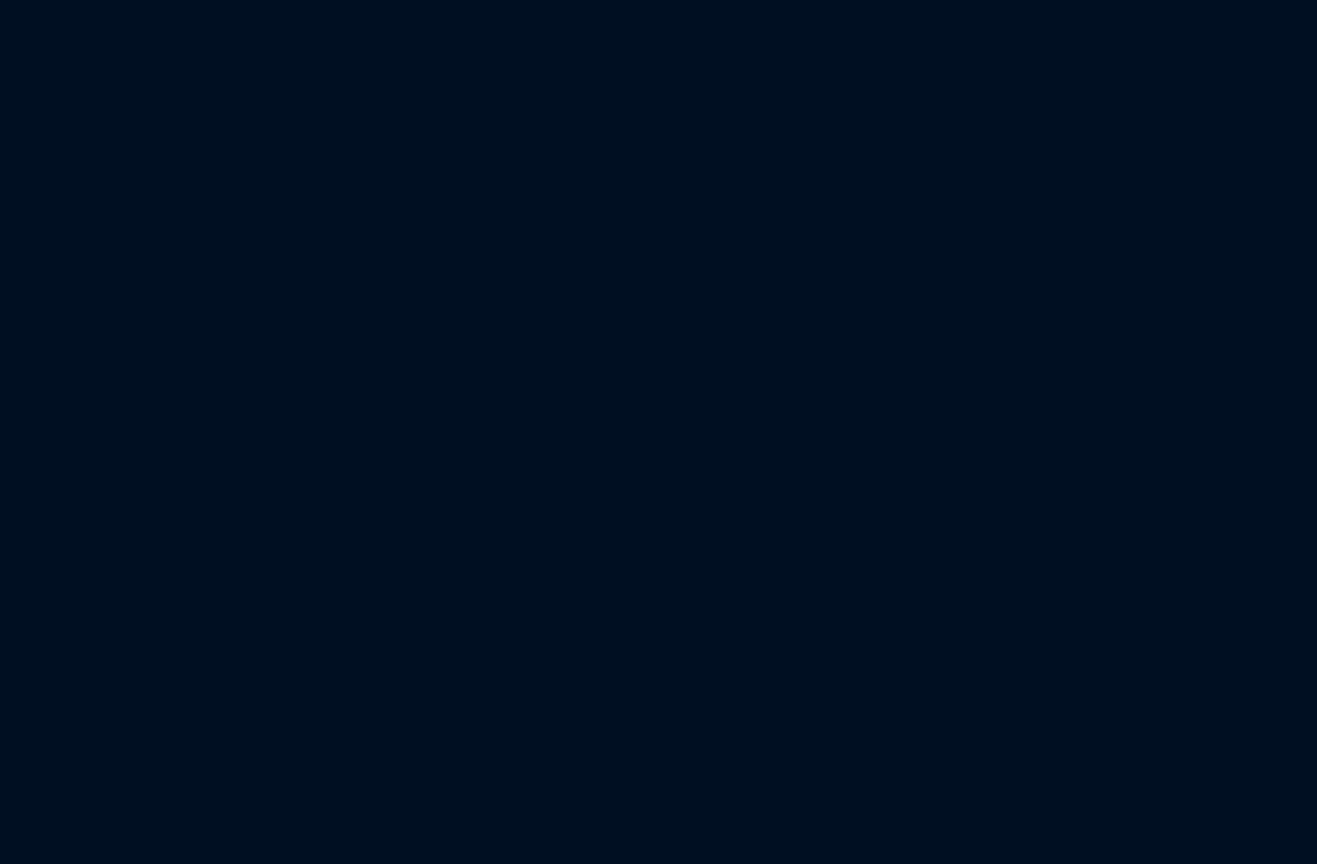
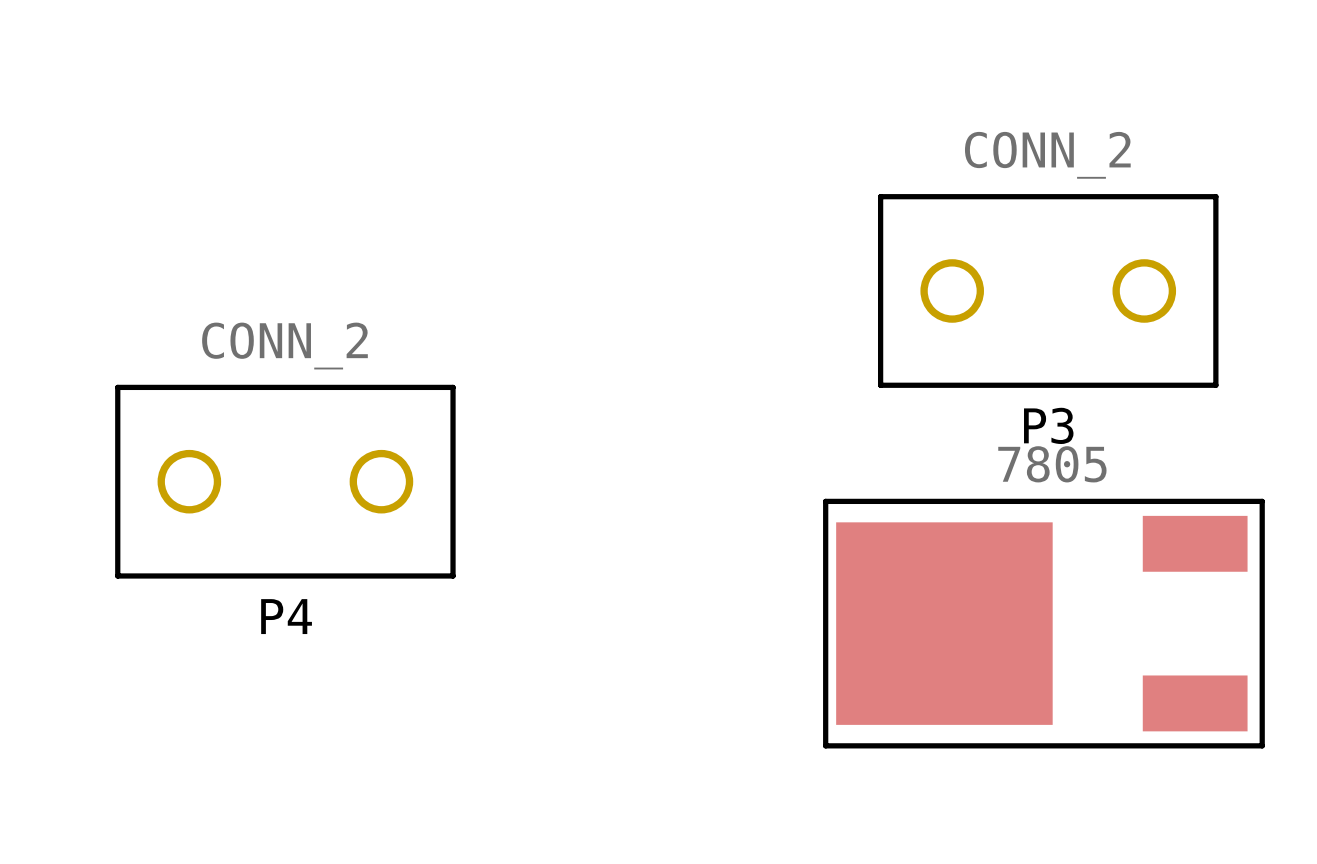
P3: none -> CONN_2 (1048, 290)
P4: none -> CONN_2 (285, 481)
part: none -> 7805 (1043, 623)

